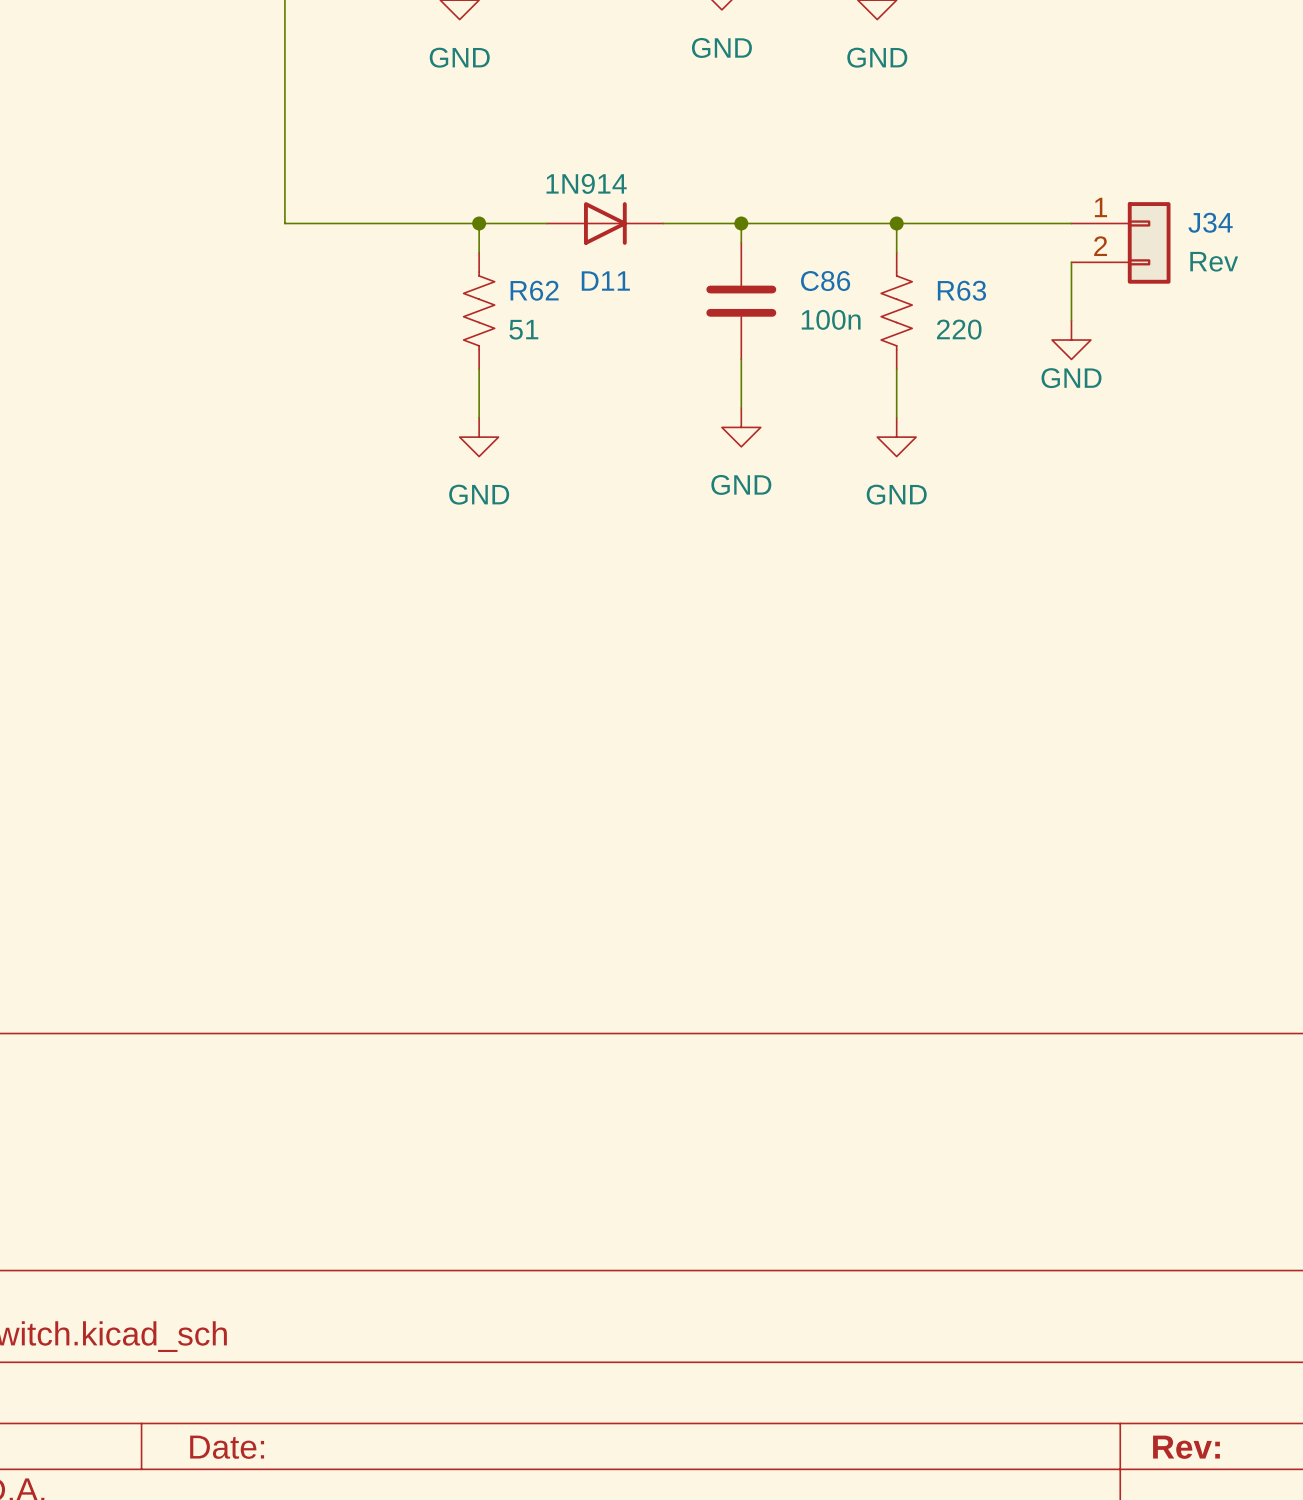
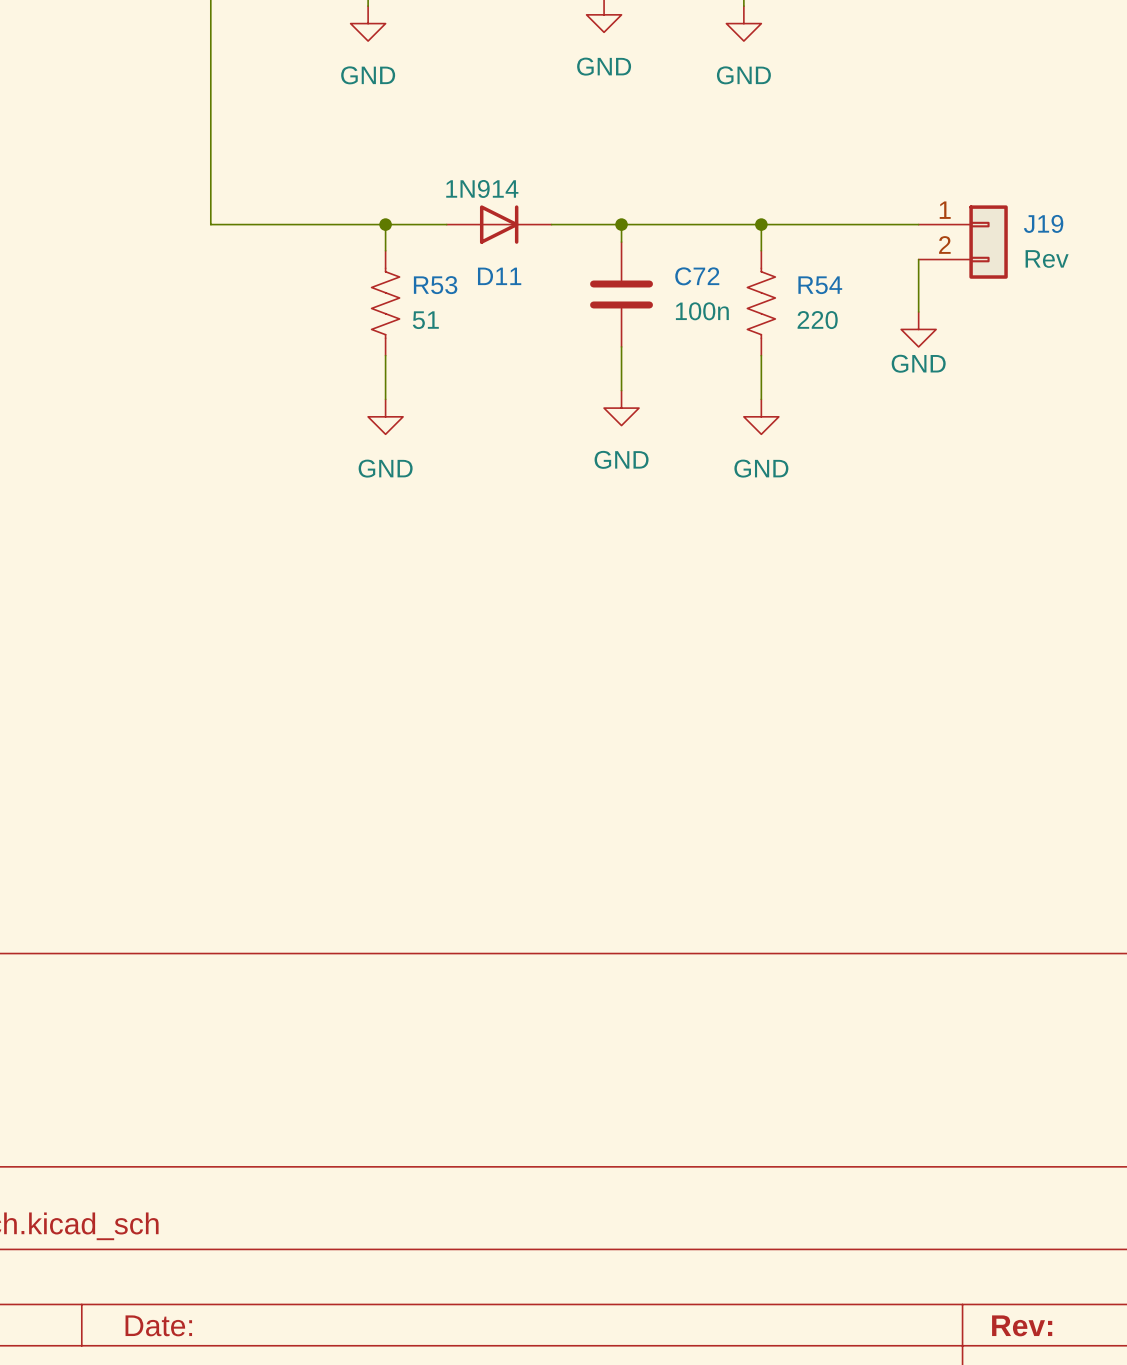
J34 name: J34 (1210, 222) -> J19 (1043, 223)
C86 name: C86 (825, 281) -> C72 (697, 276)
R62 name: R62 (534, 290) -> R53 (435, 285)
R63 name: R63 (961, 290) -> R54 (820, 285)

